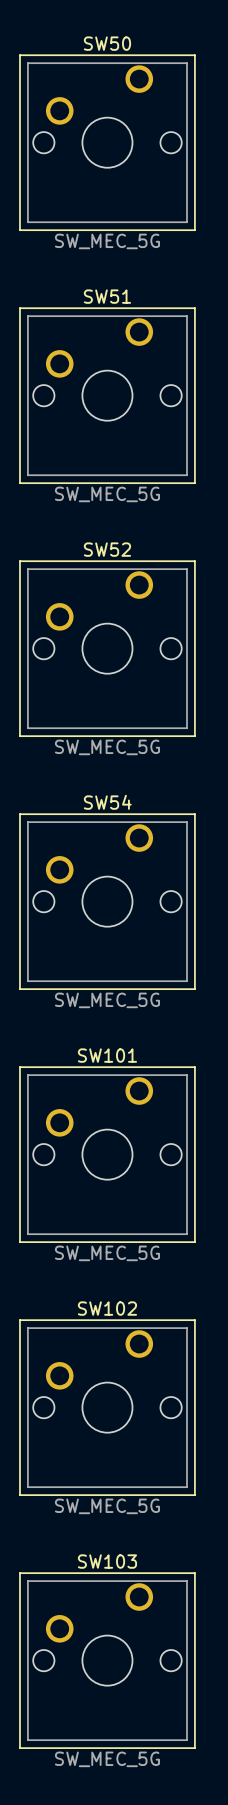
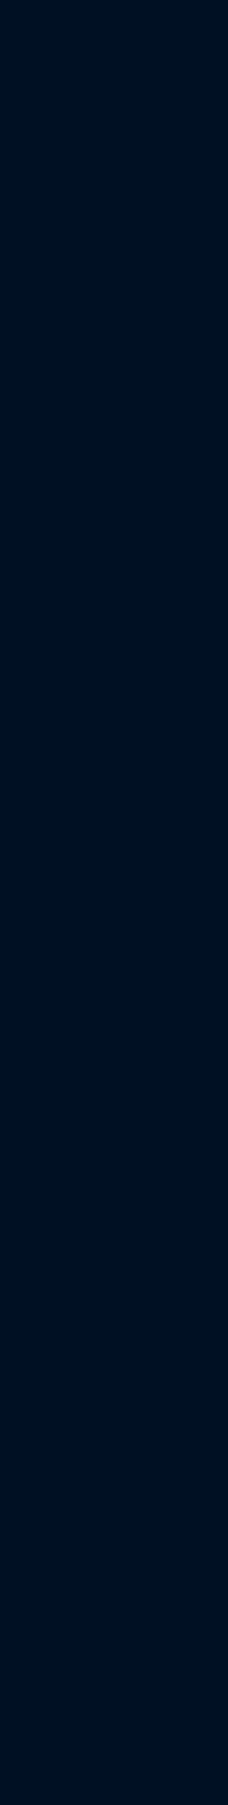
SW50: SW_MEC_5G (107, 142) -> none
SW51: SW_MEC_5G (107, 395) -> none
SW52: SW_MEC_5G (107, 648) -> none
SW54: SW_MEC_5G (107, 901) -> none
SW101: SW_MEC_5G (107, 1154) -> none
SW102: SW_MEC_5G (107, 1407) -> none
SW103: SW_MEC_5G (107, 1660) -> none

